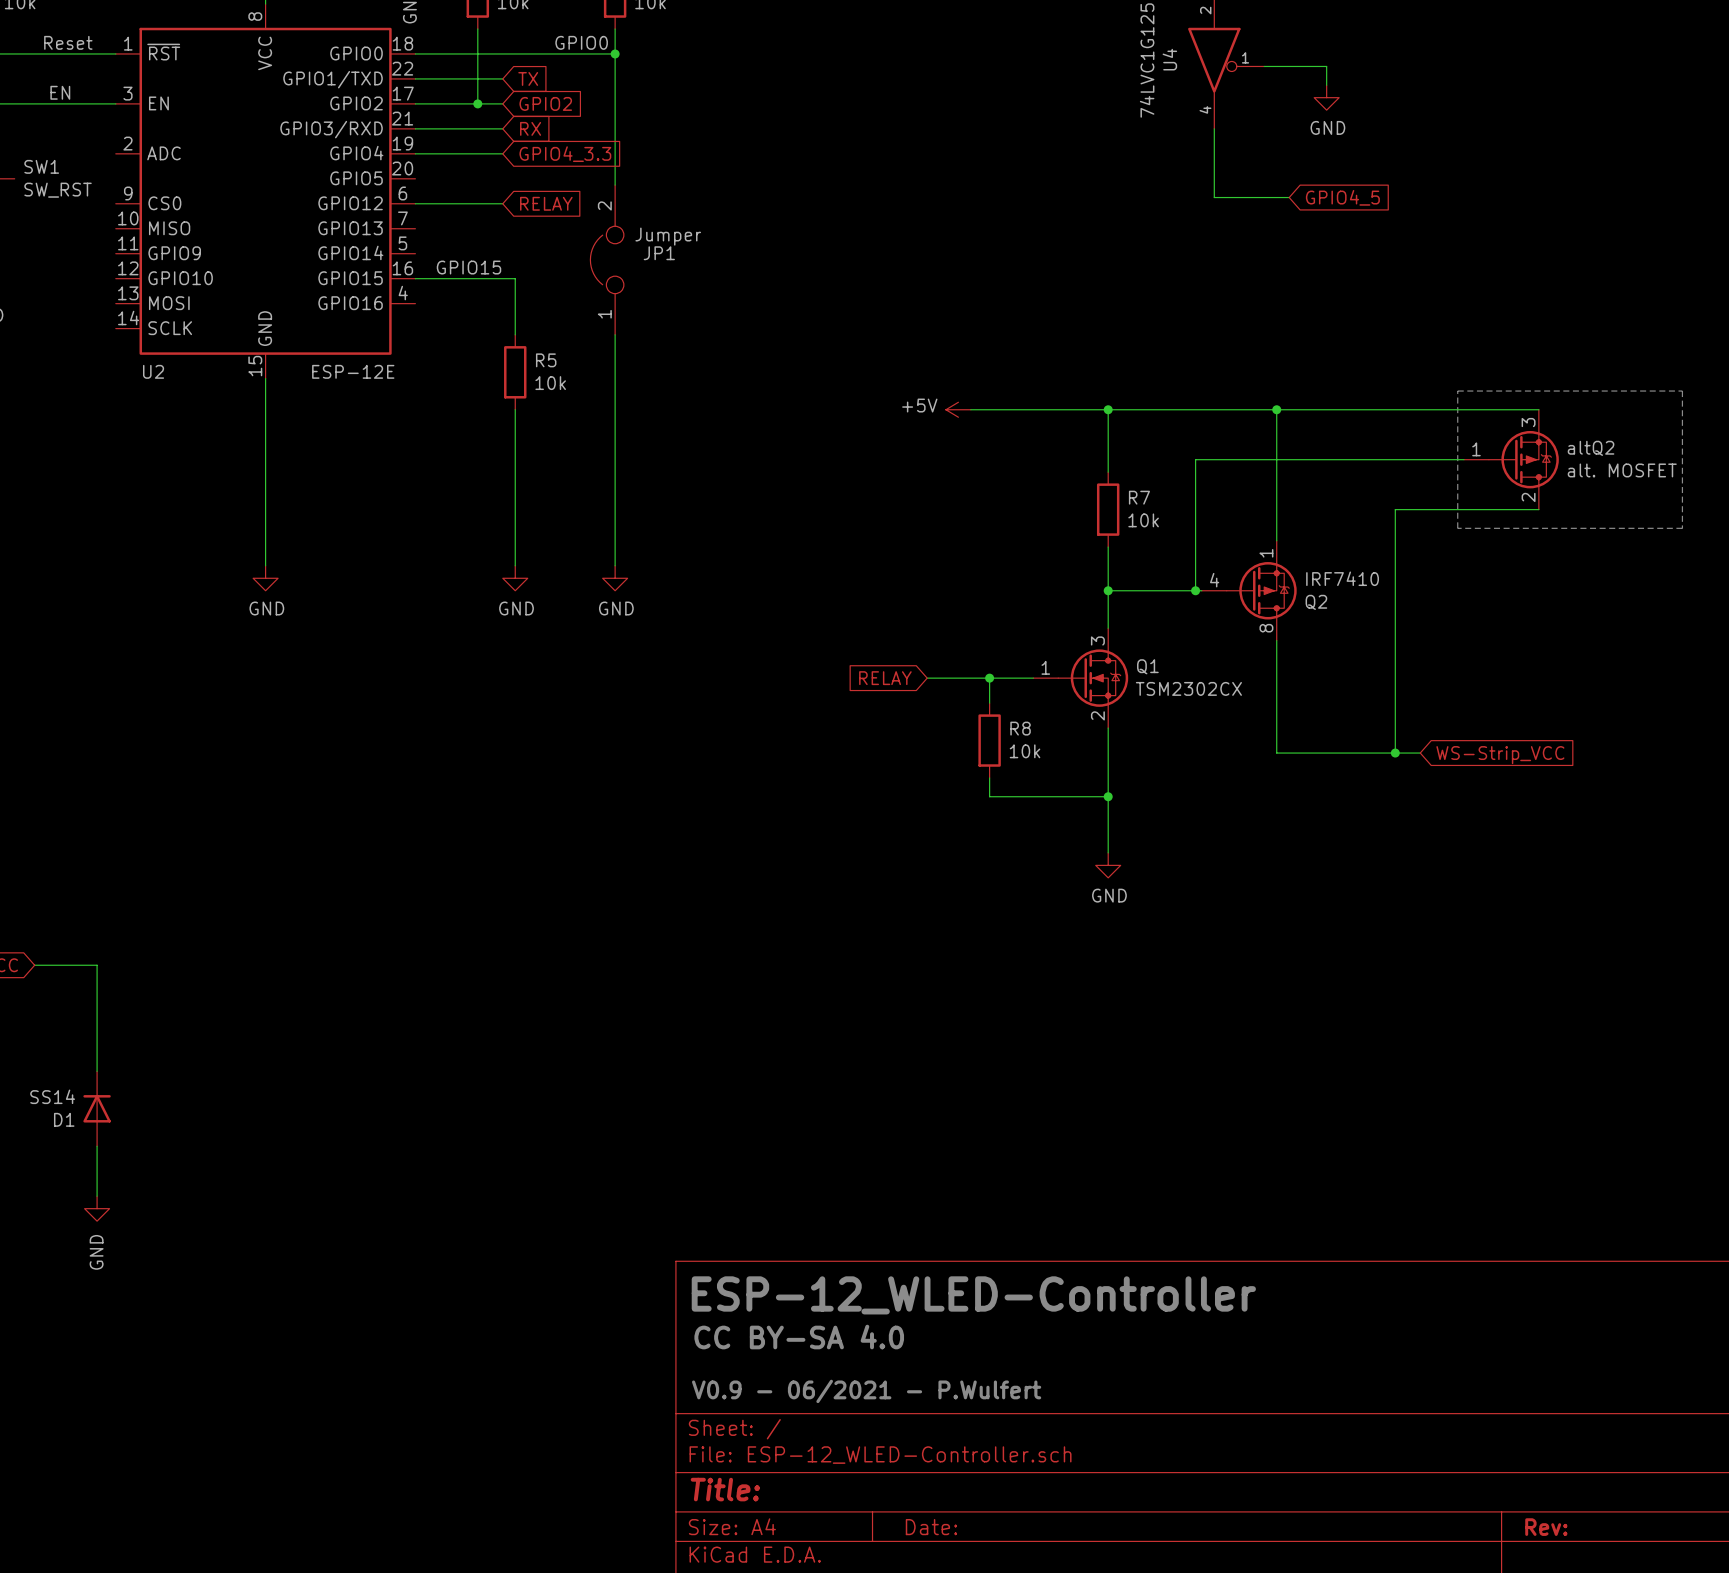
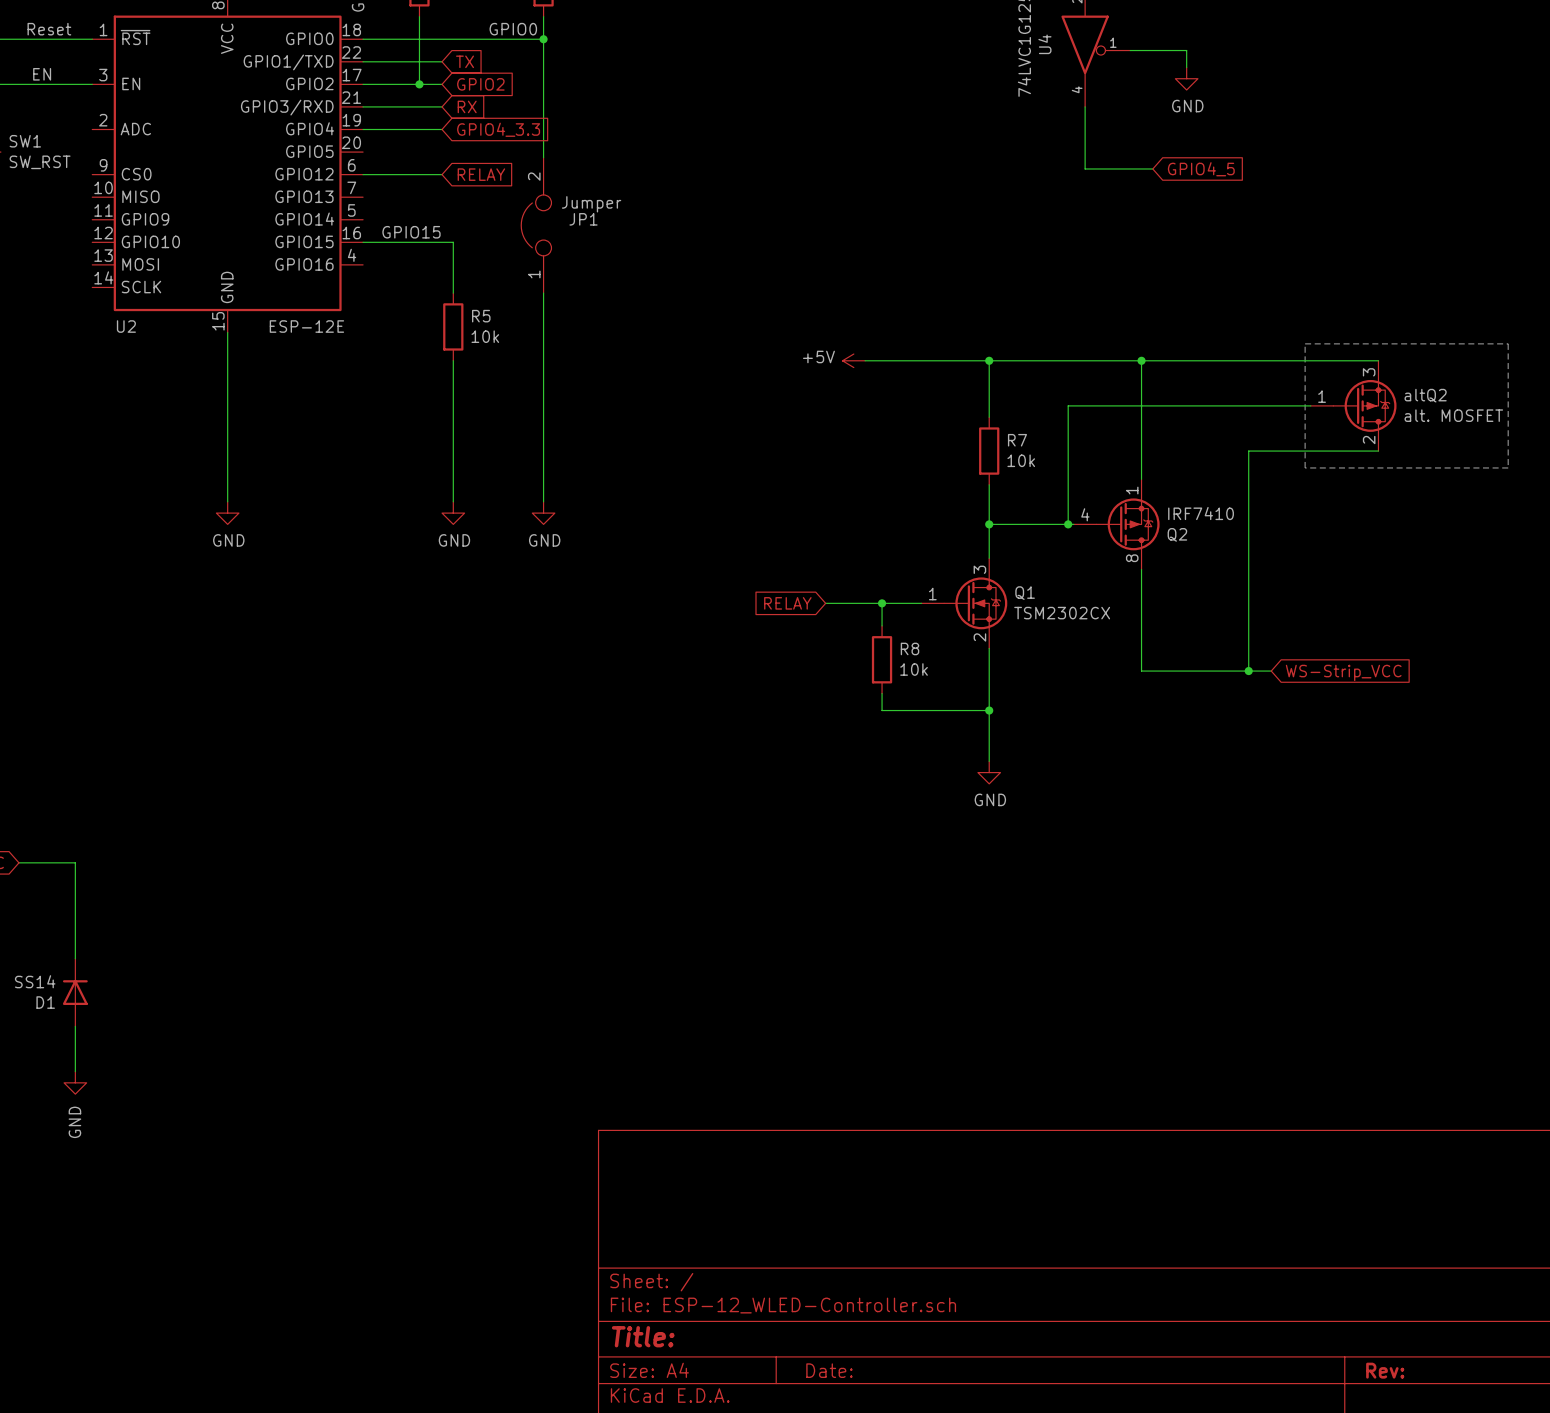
text: ESP-12_WLED-Controller (973, 1295) -> none
text: CC BY-SA 4.0 (799, 1337) -> none
text: V0.9 - 06/2021 - P.Wulfert (866, 1391) -> none

